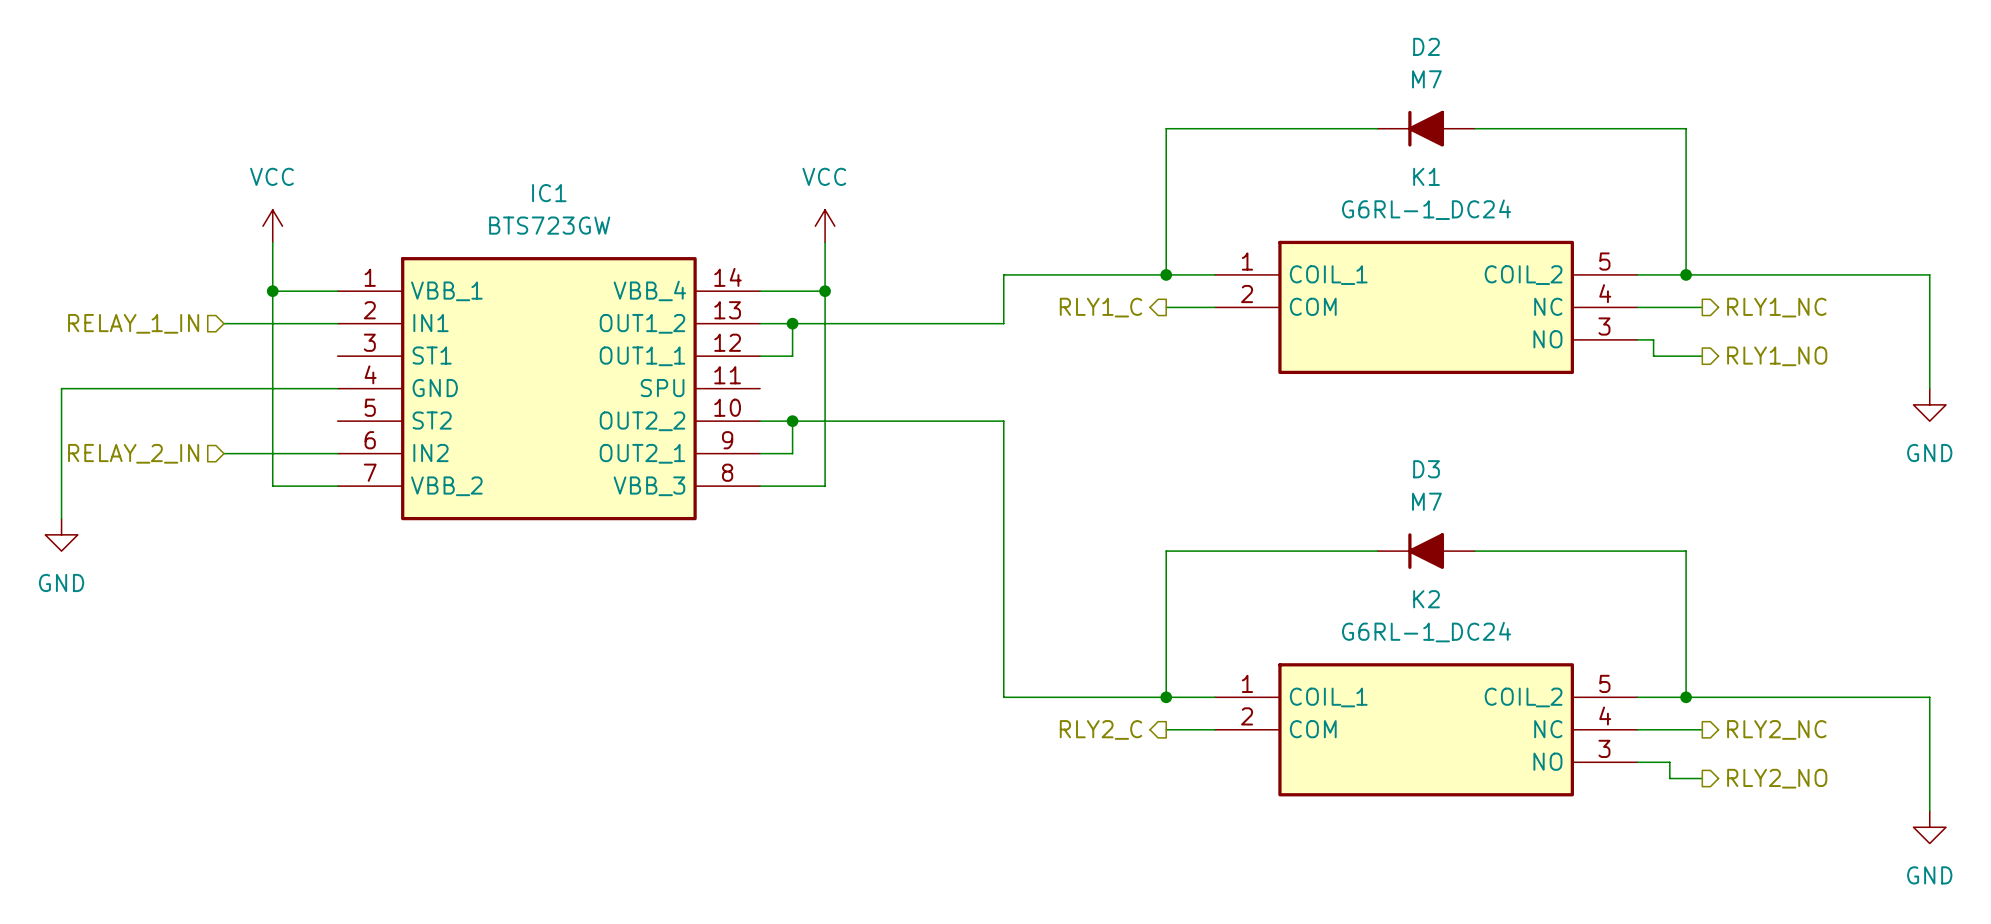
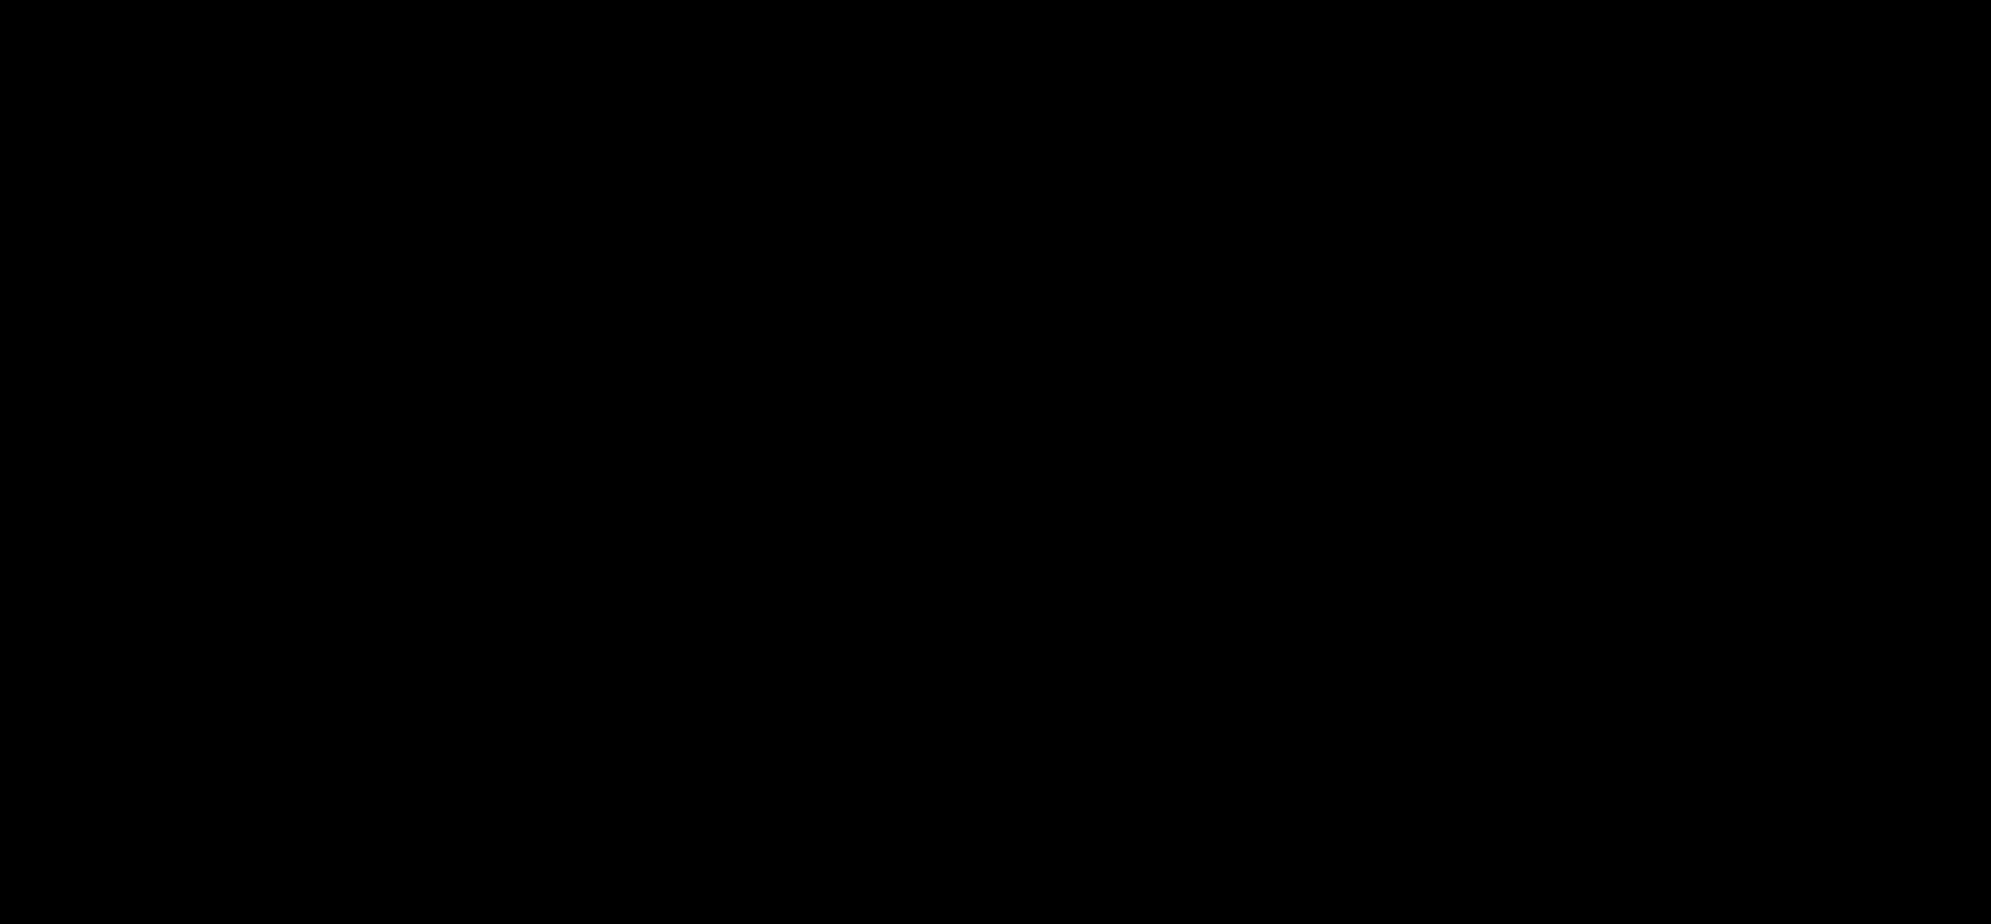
wire: (1377, 128) (1166, 128) (1166, 274) -> none
D2: M7 (1426, 128) -> none
wire: (1474, 128) (1686, 128) (1686, 274) -> none
power symbol: VCC (272, 226) -> none
power symbol: VCC (825, 226) -> none
wire: (272, 242) (272, 486) (337, 486) -> none
wire: (825, 242) (825, 486) (760, 486) -> none
junction: (1166, 274) -> none
wire: (1214, 274) (1003, 274) (1003, 323) (760, 323) -> none
wire: (1637, 274) (1929, 274) (1929, 388) -> none
junction: (1686, 274) -> none
wire: (272, 291) (337, 291) -> none
junction: (272, 291) -> none
wire: (760, 291) (825, 291) -> none
junction: (825, 291) -> none
hierarchical label: RLY1_C (1100, 307) -> none
wire: (1166, 307) (1214, 307) -> none
K1: G6RL-1_DC24 (1426, 307) -> none
wire: (1637, 307) (1702, 307) -> none
hierarchical label: RLY1_NC (1776, 307) -> none
hierarchical label: RELAY_1_IN (133, 323) -> none
wire: (224, 323) (337, 323) -> none
wire: (792, 323) (792, 356) (760, 356) -> none
junction: (792, 323) -> none
wire: (1637, 339) (1653, 339) (1653, 356) (1702, 356) -> none
hierarchical label: RLY1_NO (1777, 356) -> none
wire: (337, 388) (61, 388) (61, 518) -> none
IC1: BTS723GW (548, 388) -> none
power symbol: GND (1929, 404) -> none
wire: (760, 421) (1003, 421) (1003, 697) (1214, 697) -> none
wire: (792, 421) (792, 453) (760, 453) -> none
junction: (792, 421) -> none
hierarchical label: RELAY_2_IN (133, 453) -> none
wire: (224, 453) (337, 453) -> none
power symbol: GND (61, 534) -> none
wire: (1377, 551) (1166, 551) (1166, 697) -> none
D3: M7 (1426, 551) -> none
wire: (1474, 551) (1686, 551) (1686, 697) -> none
junction: (1166, 697) -> none
wire: (1637, 697) (1929, 697) (1929, 811) -> none
junction: (1686, 697) -> none
hierarchical label: RLY2_C (1100, 729) -> none
wire: (1166, 729) (1214, 729) -> none
K2: G6RL-1_DC24 (1426, 729) -> none
wire: (1637, 729) (1702, 729) -> none
hierarchical label: RLY2_NC (1776, 729) -> none
wire: (1637, 762) (1669, 762) (1669, 778) (1702, 778) -> none
hierarchical label: RLY2_NO (1777, 778) -> none
power symbol: GND (1929, 827) -> none

